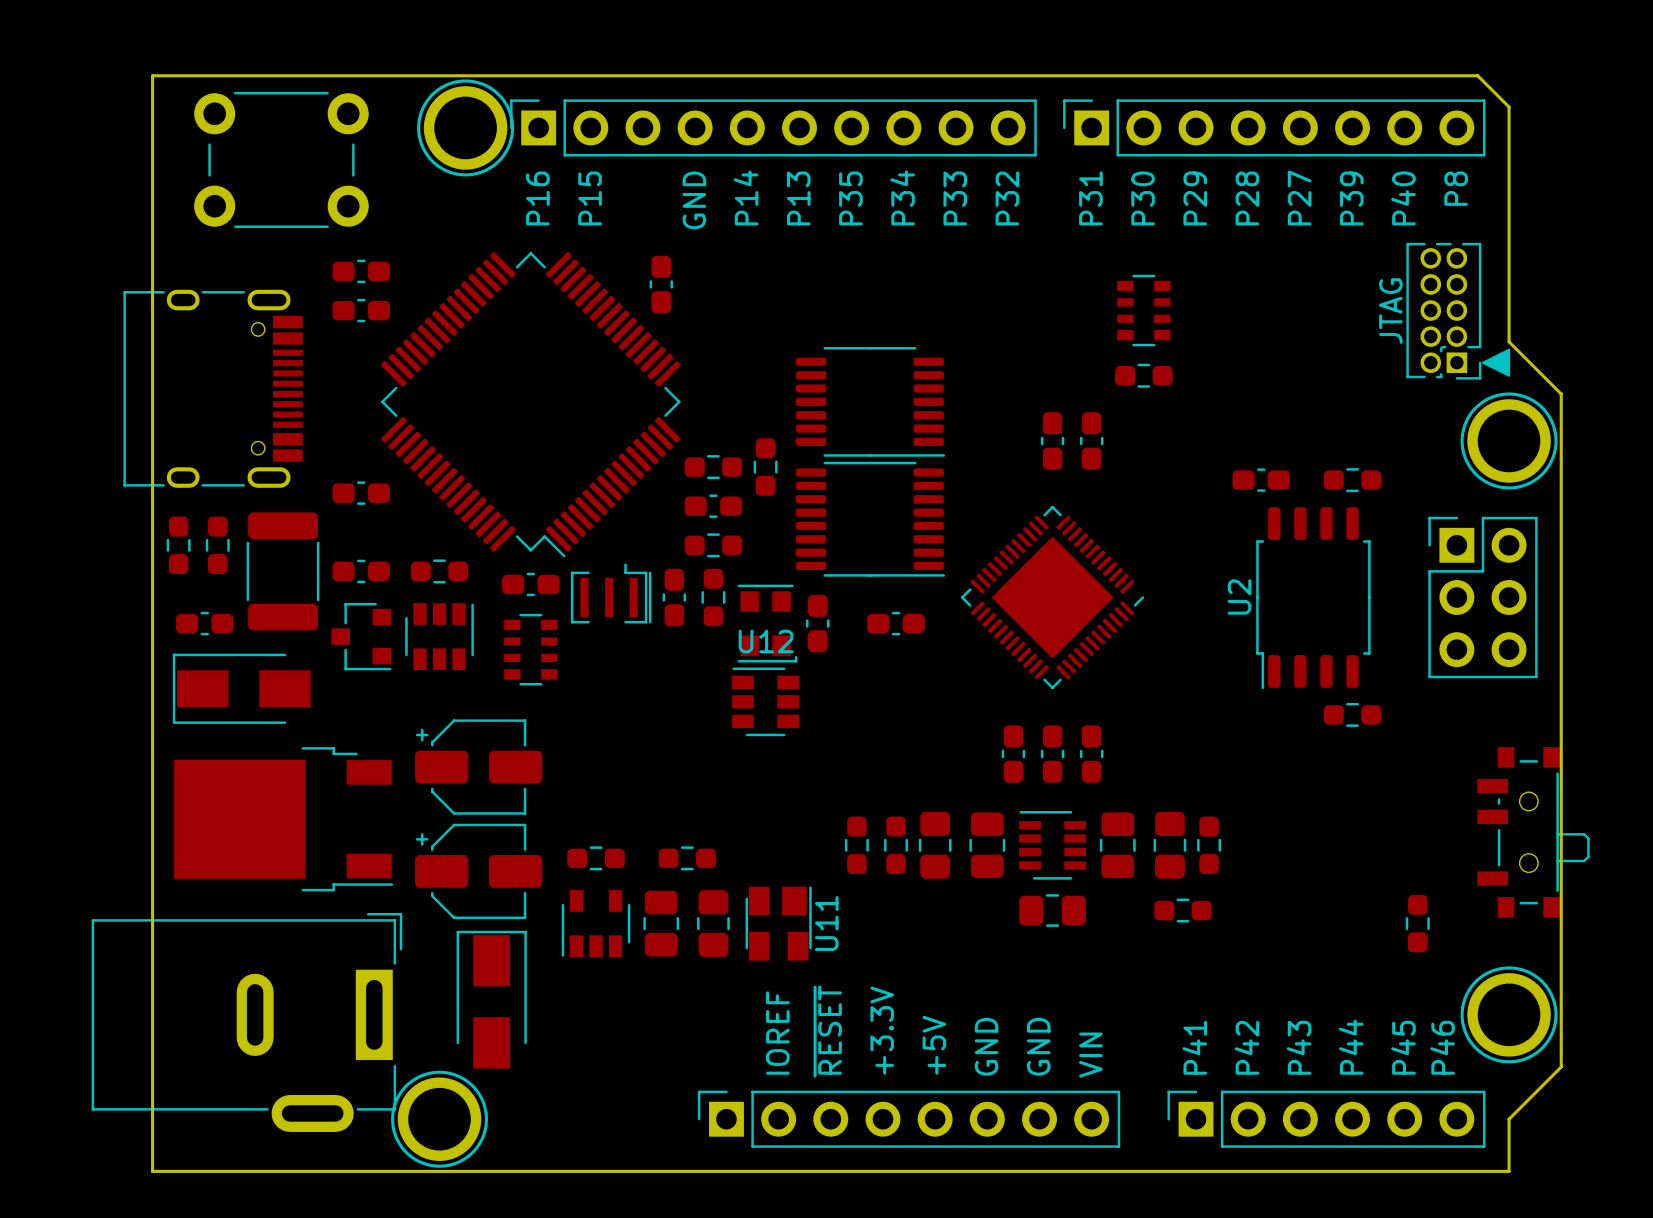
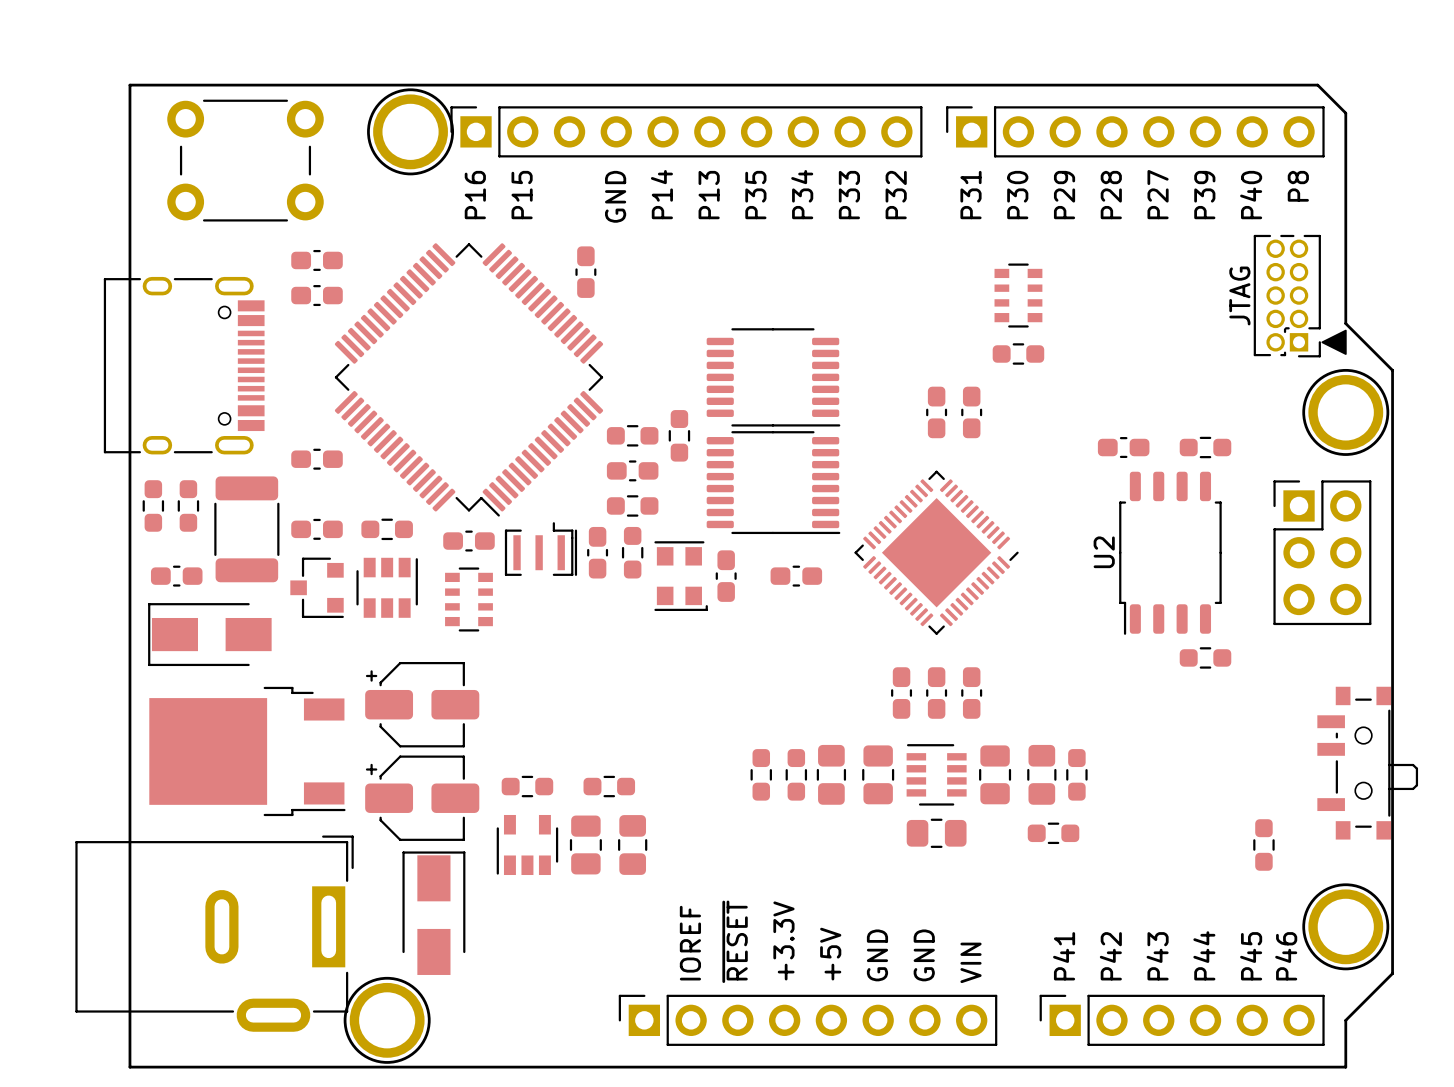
U12: (765, 701) -> none
U11: (778, 923) -> none

